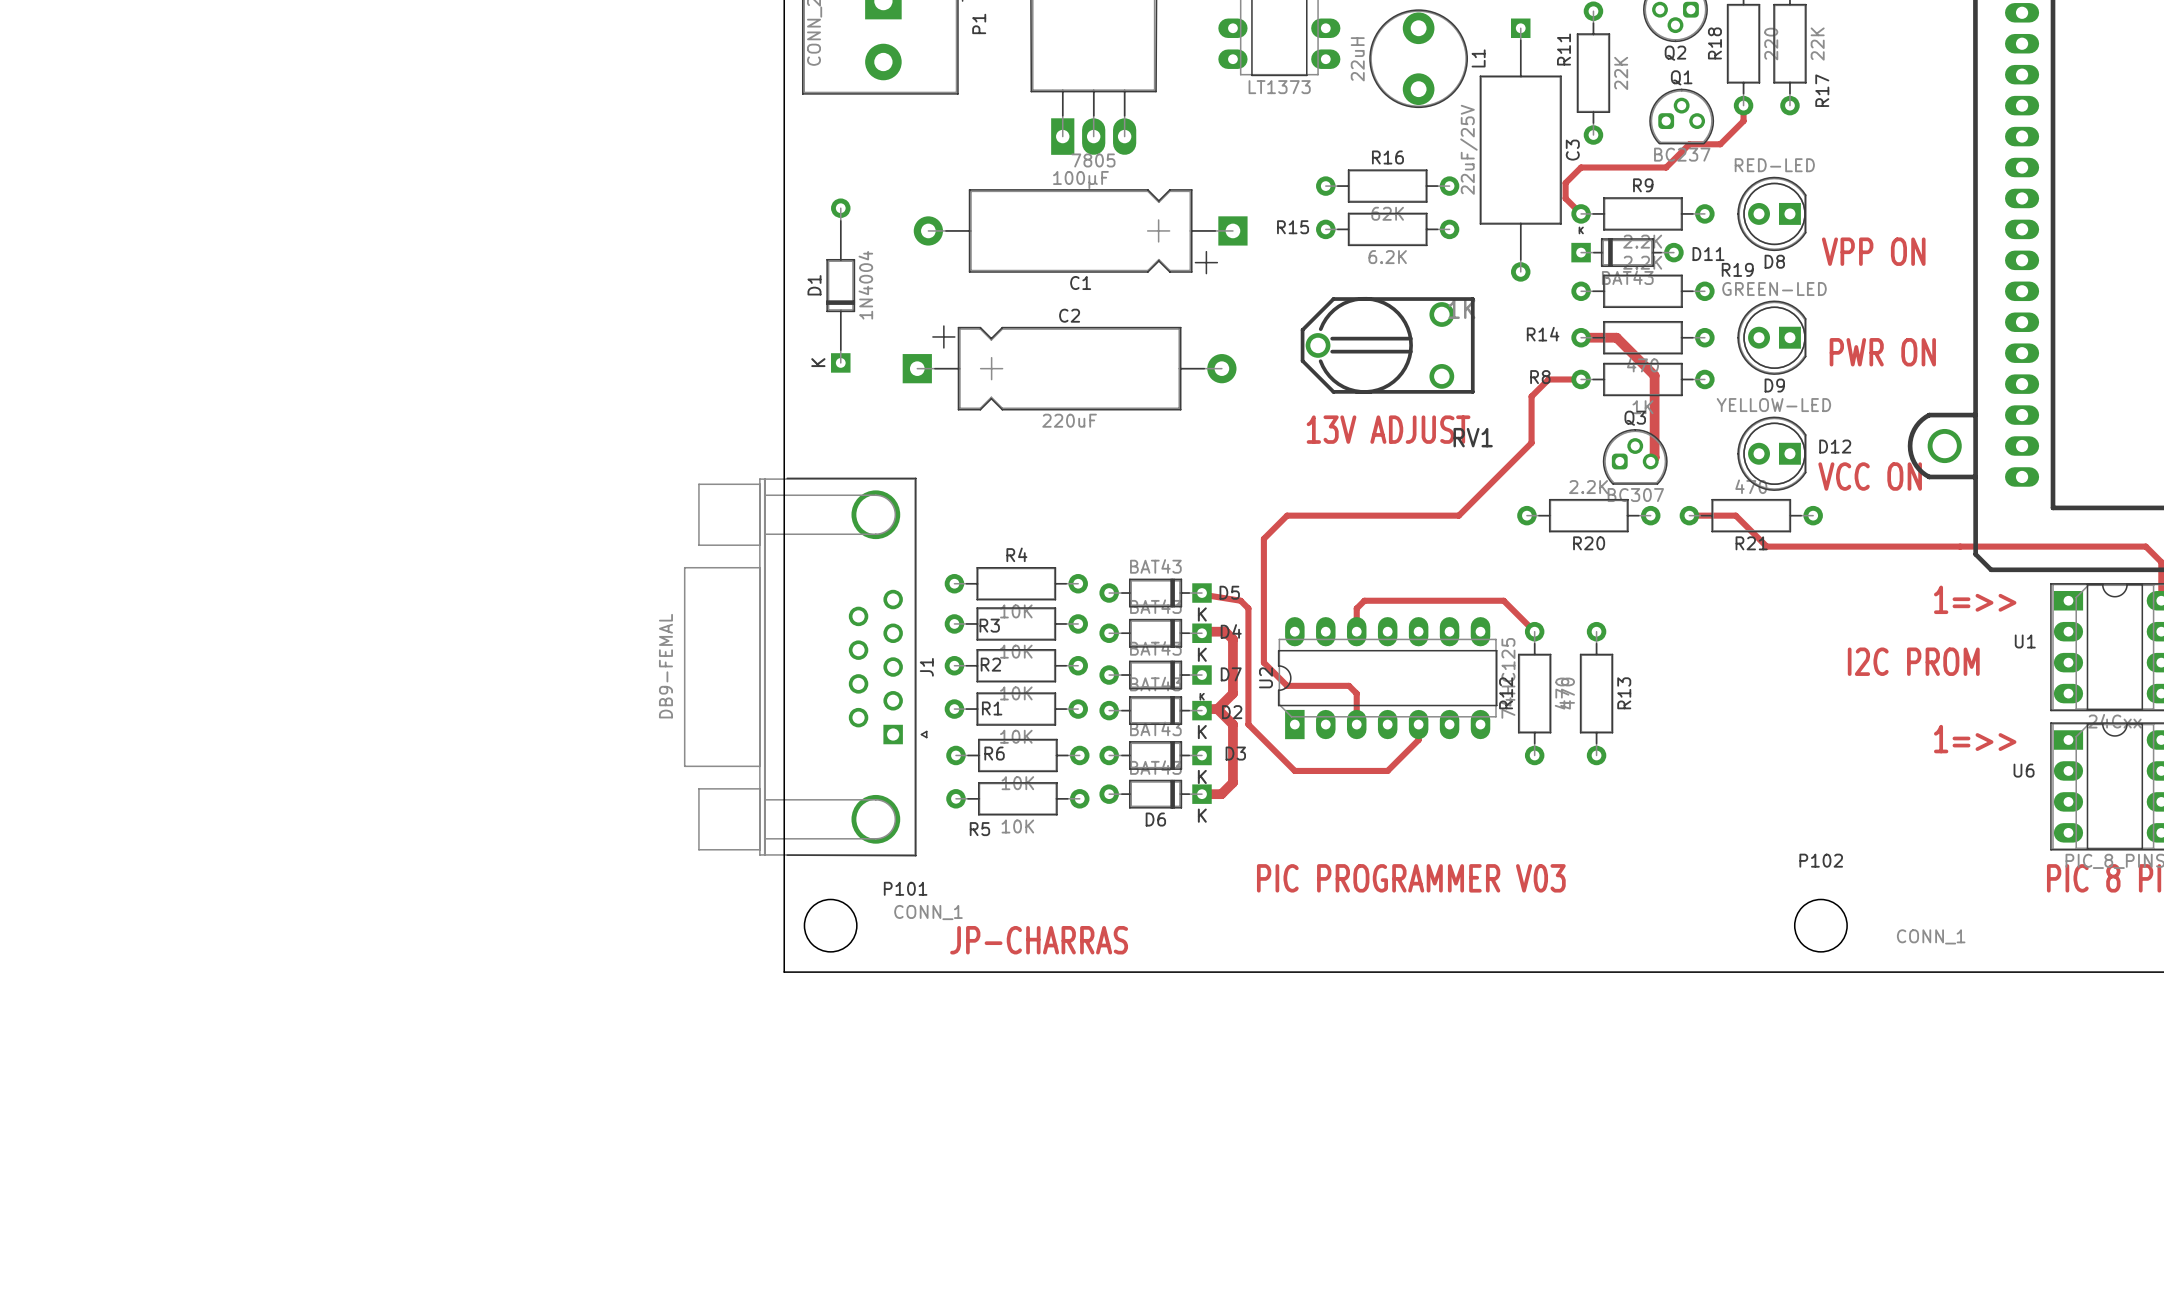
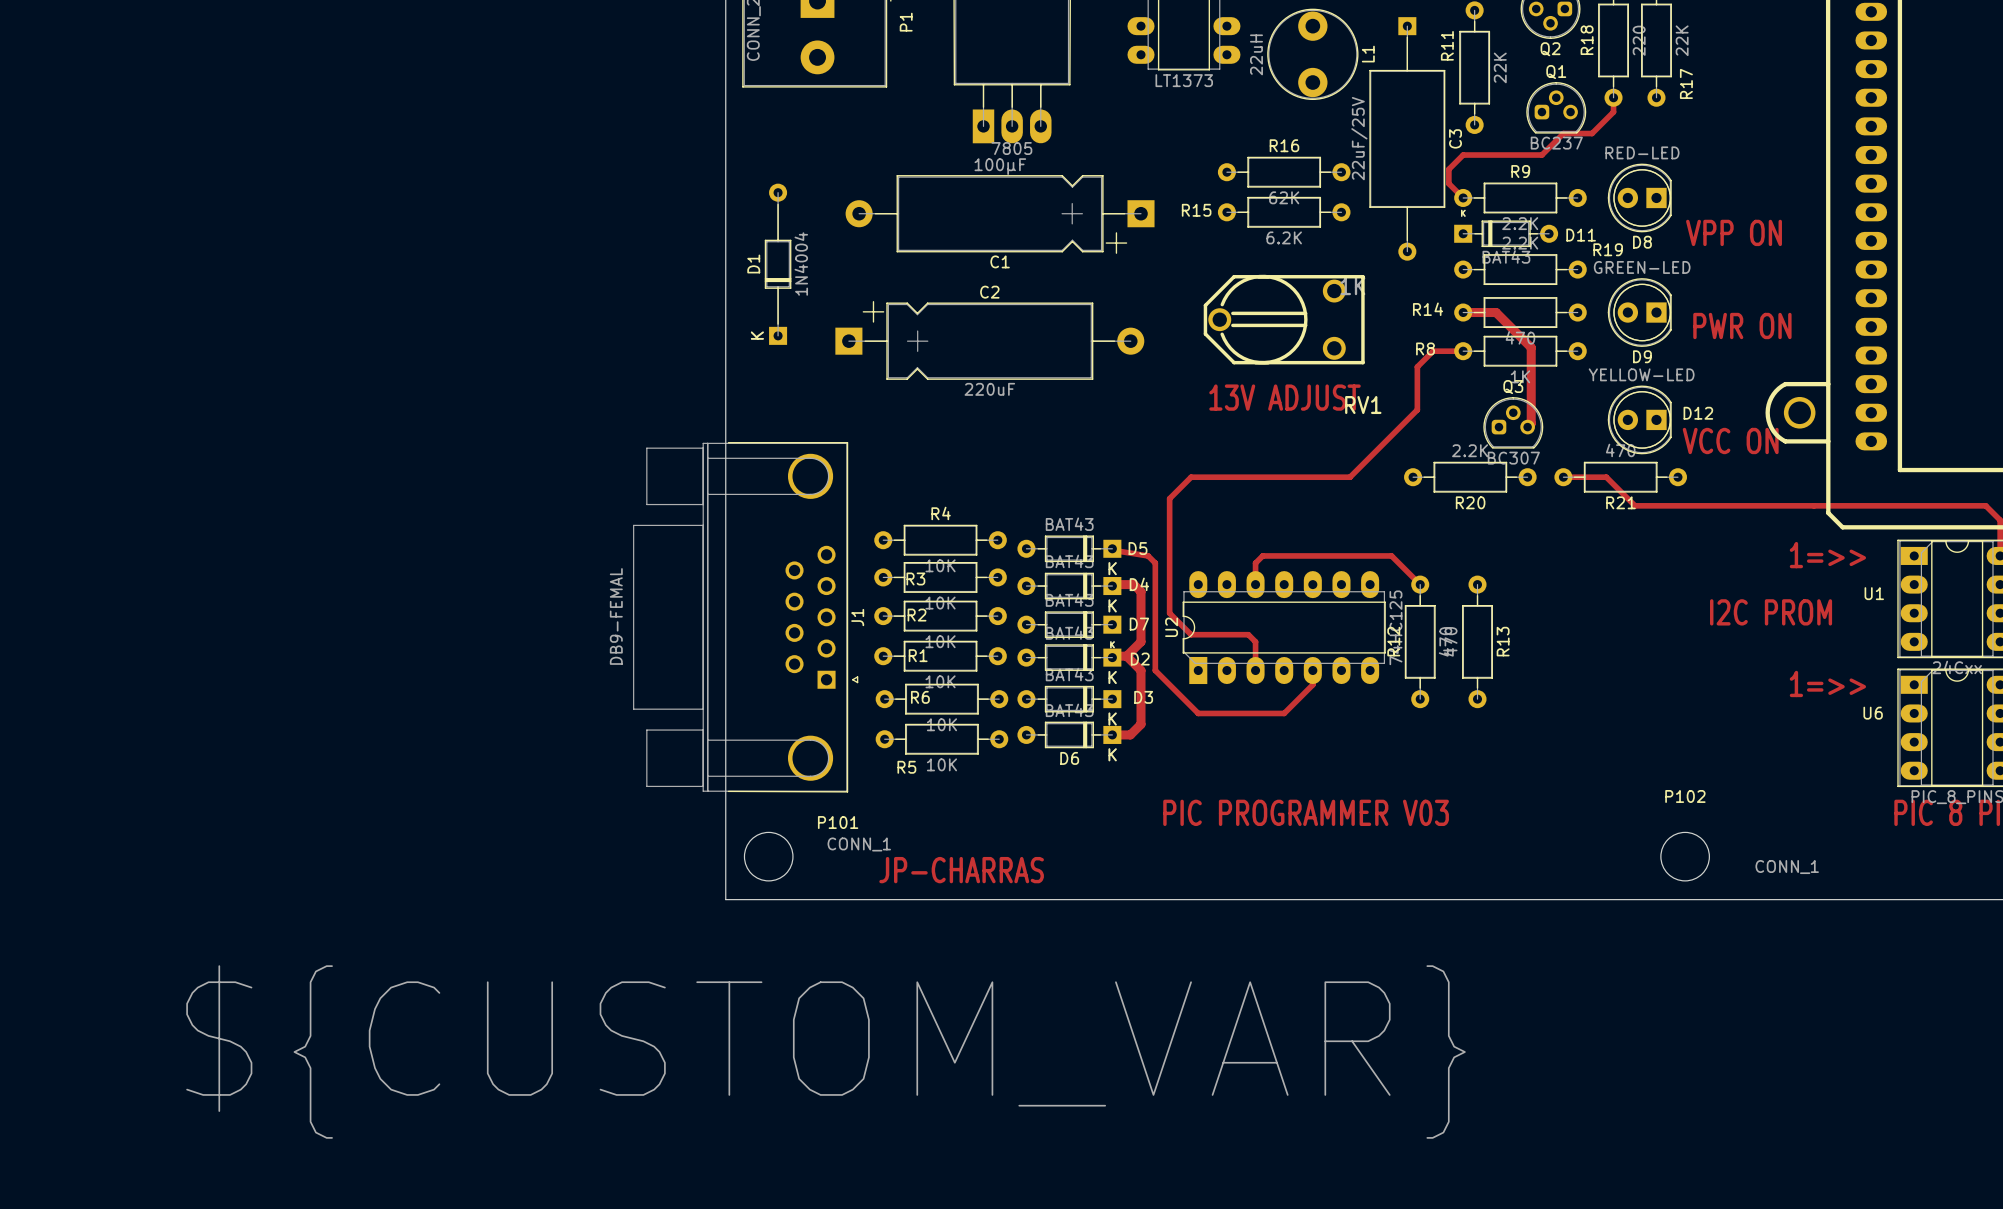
text: none -> ${CUSTOM_VAR} (825, 1052)

